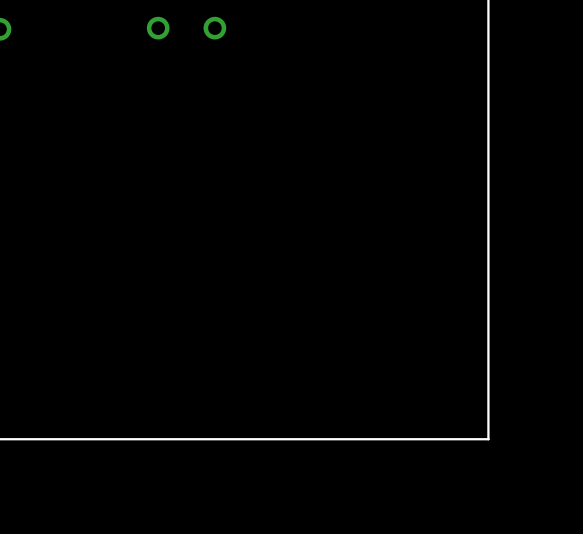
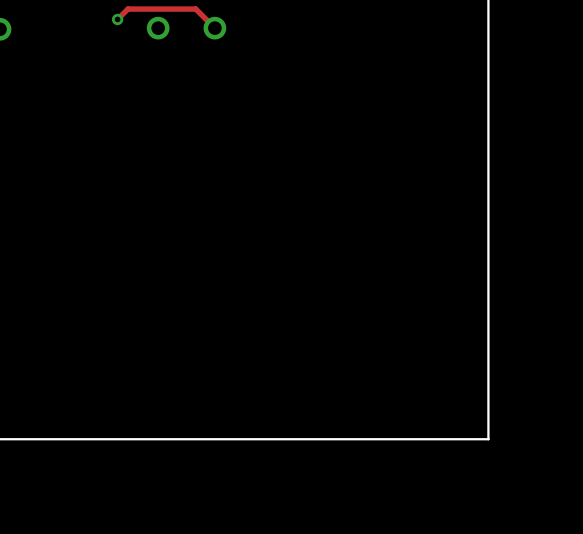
track: none -> (117, 19) (127, 9) (195, 9) (214, 28)
via: none -> (117, 19)

